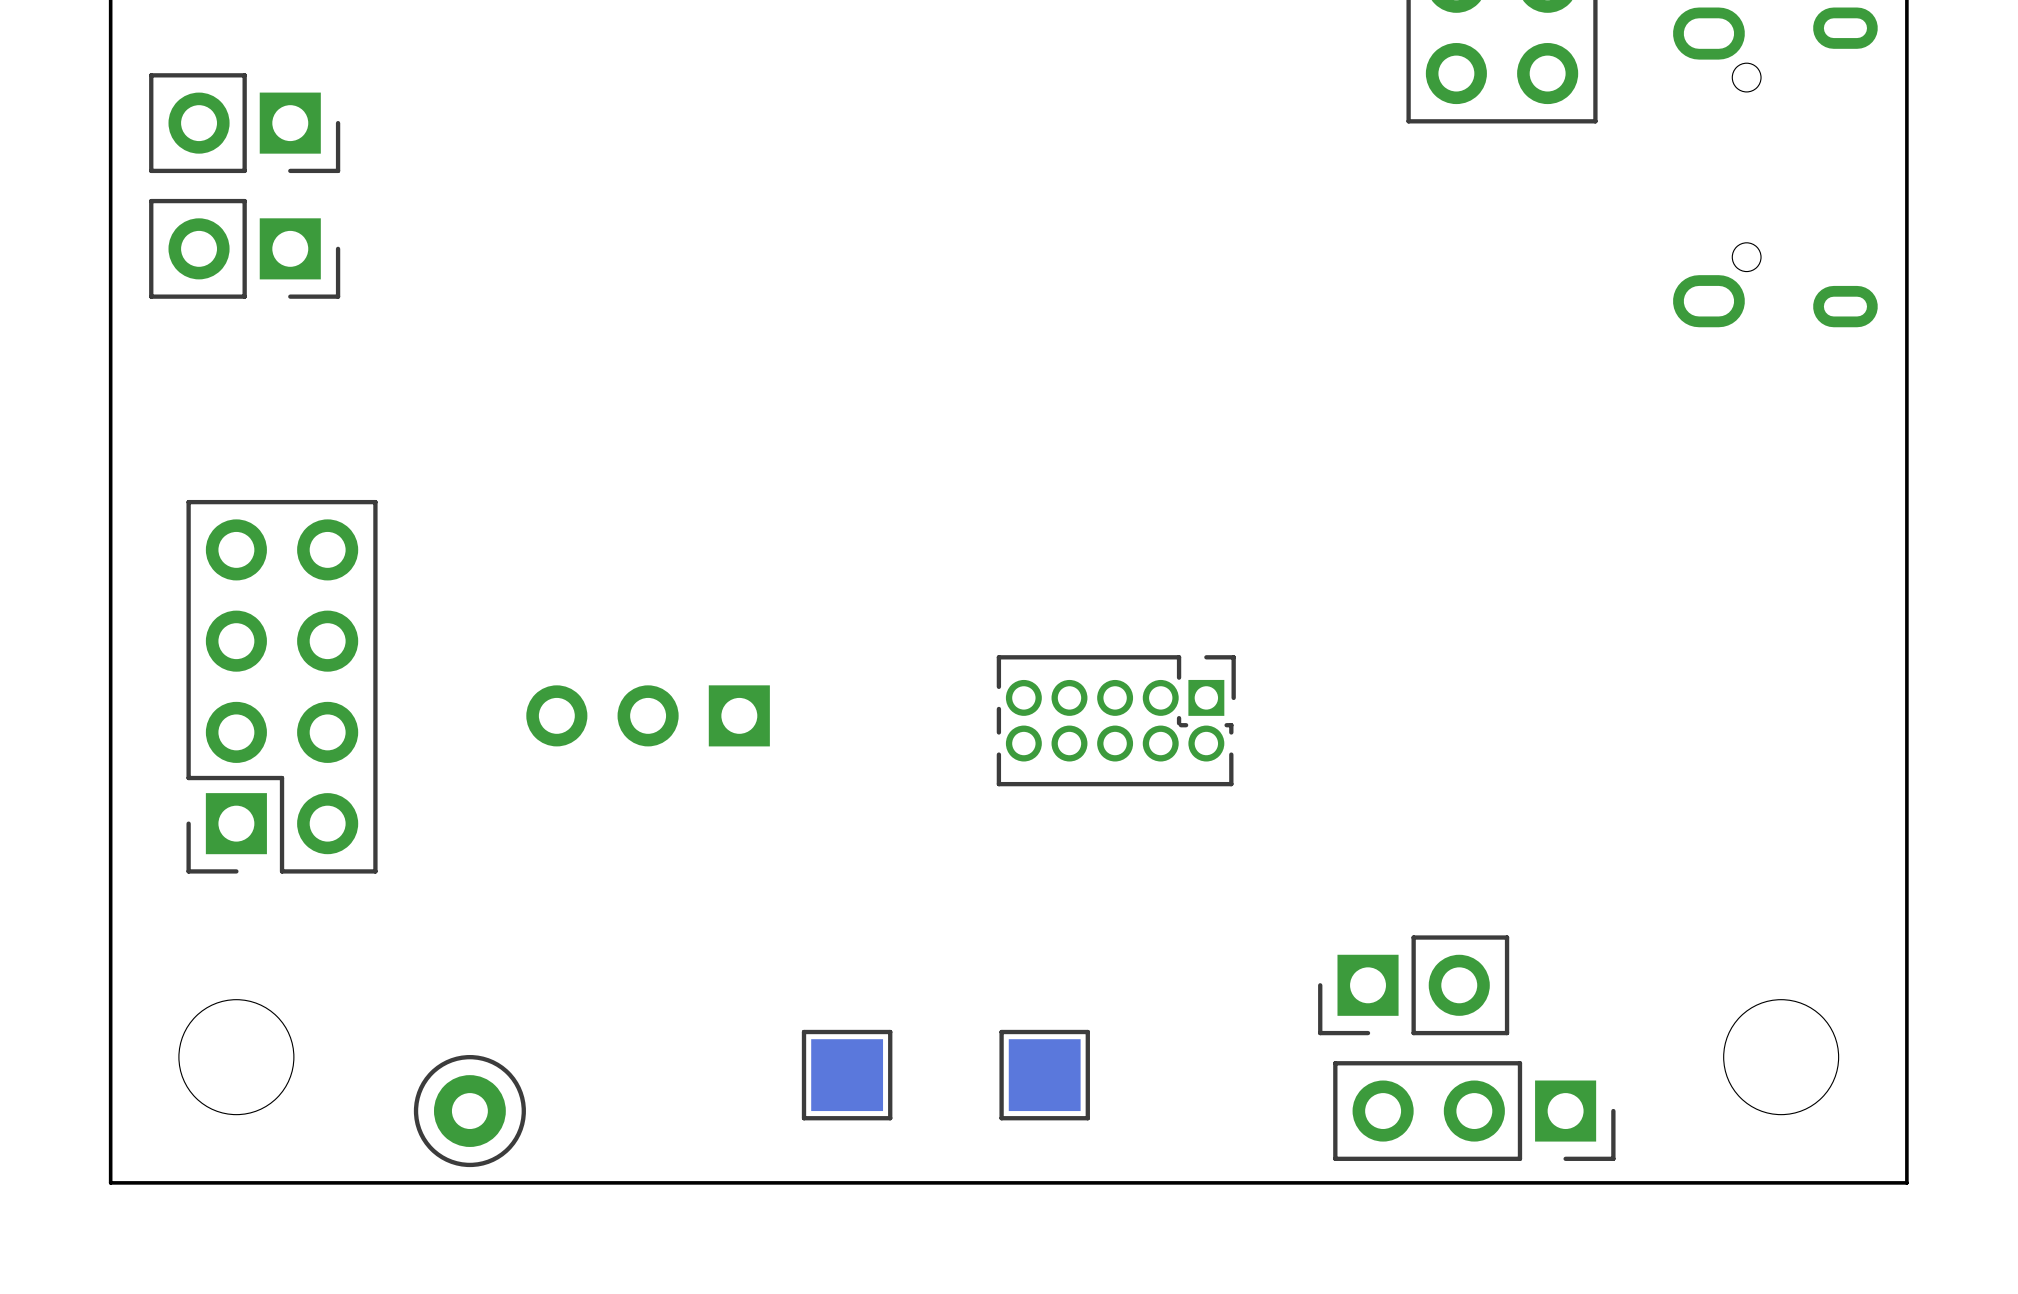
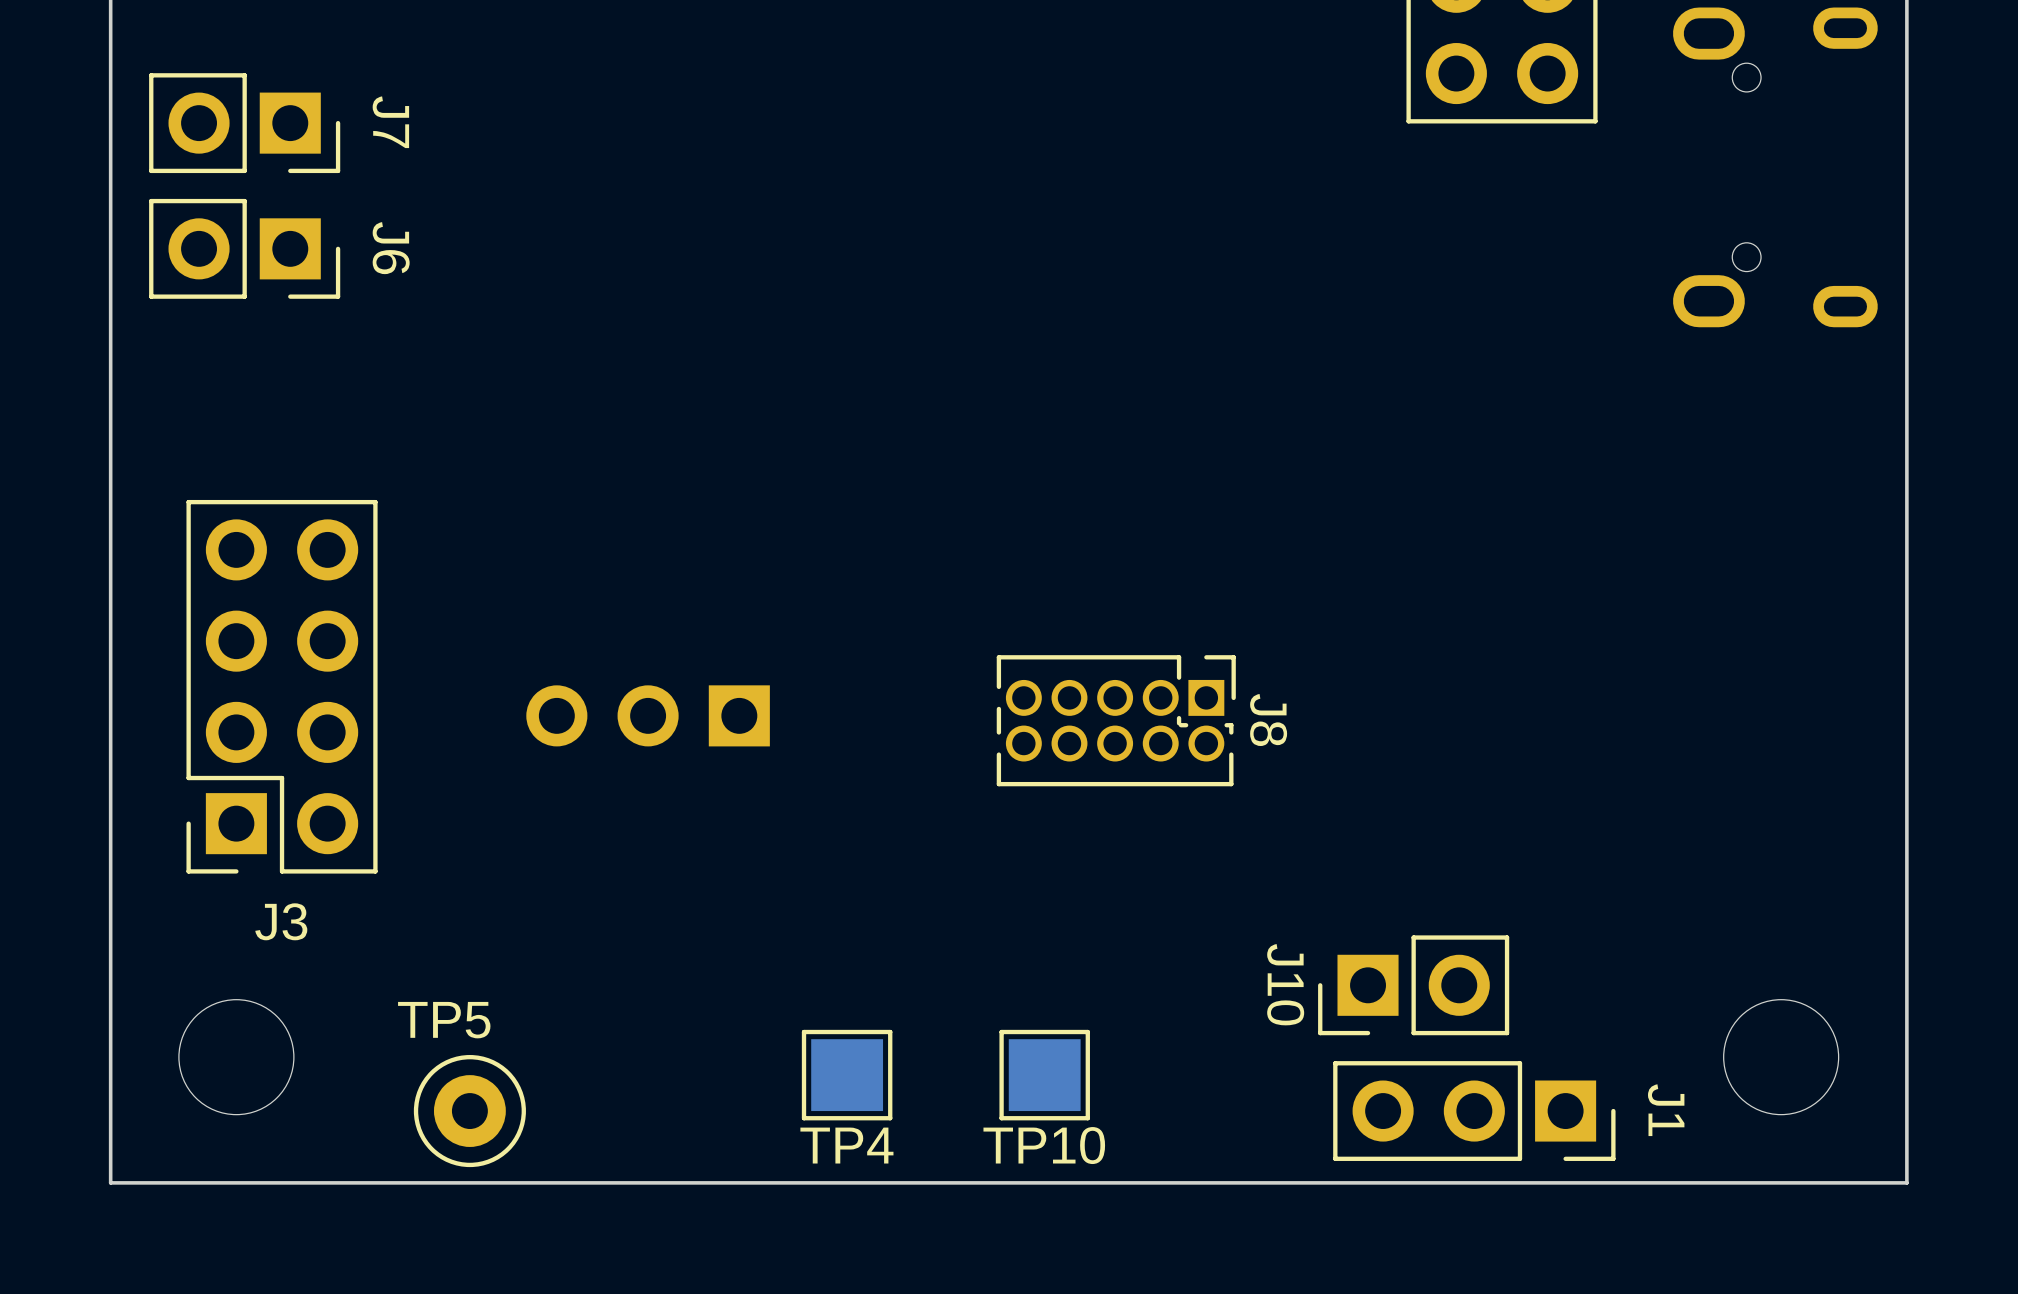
J7 name: none -> J7 (390, 122)
J6 name: none -> J6 (391, 248)
J8 name: none -> J8 (1268, 719)
J3 name: none -> J3 (281, 921)
J10 name: none -> J10 (1285, 984)
TP5 name: none -> TP5 (444, 1020)
J1 name: none -> J1 (1666, 1110)
TP4 name: none -> TP4 (846, 1145)
TP10 name: none -> TP10 (1044, 1145)

